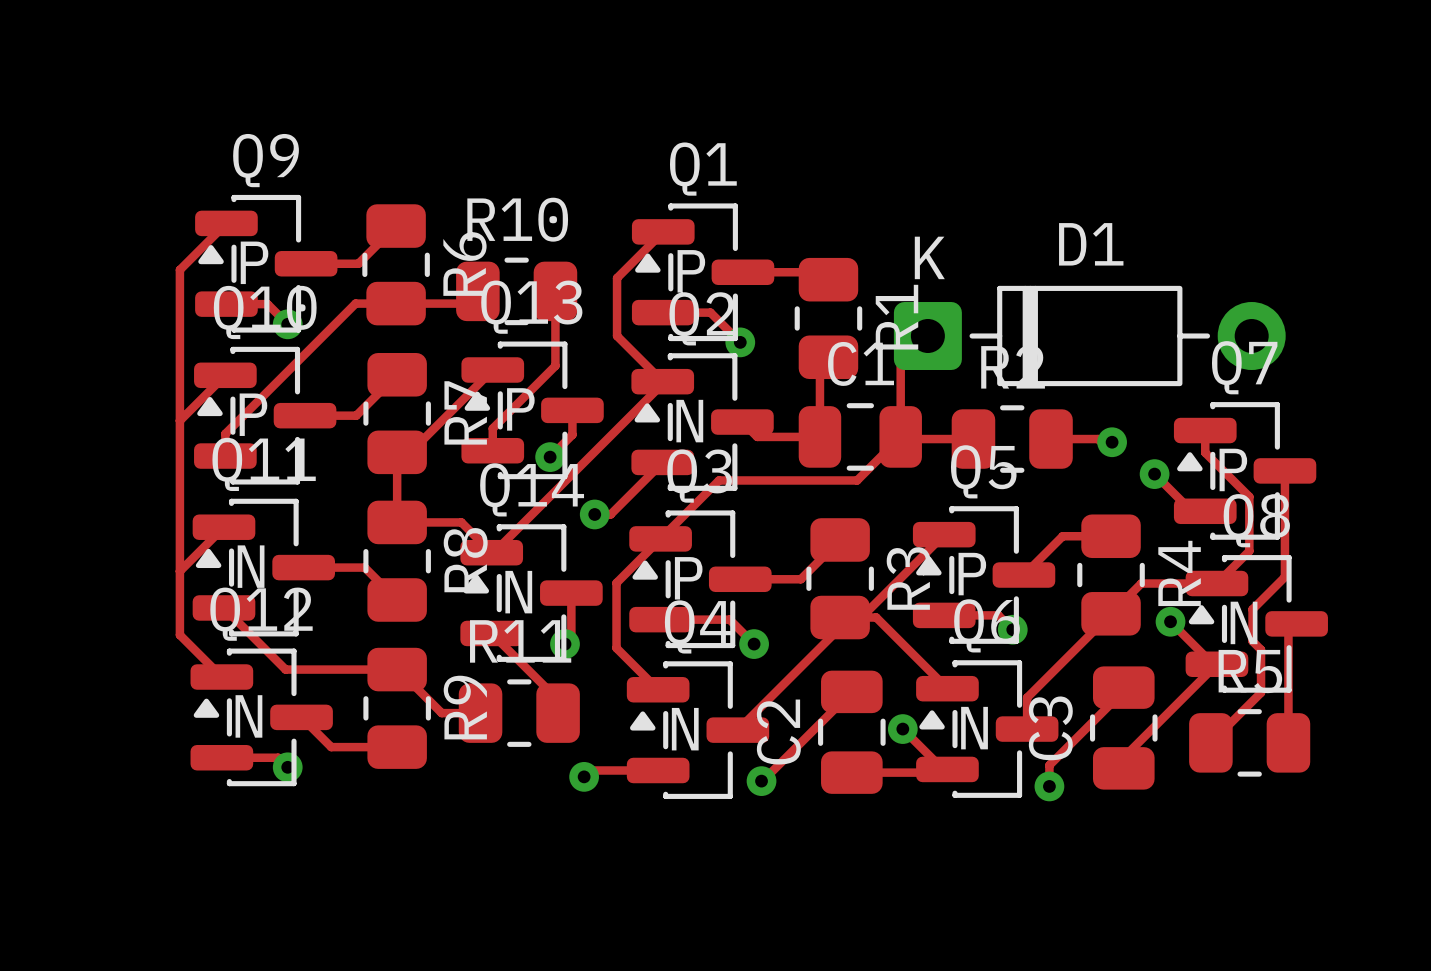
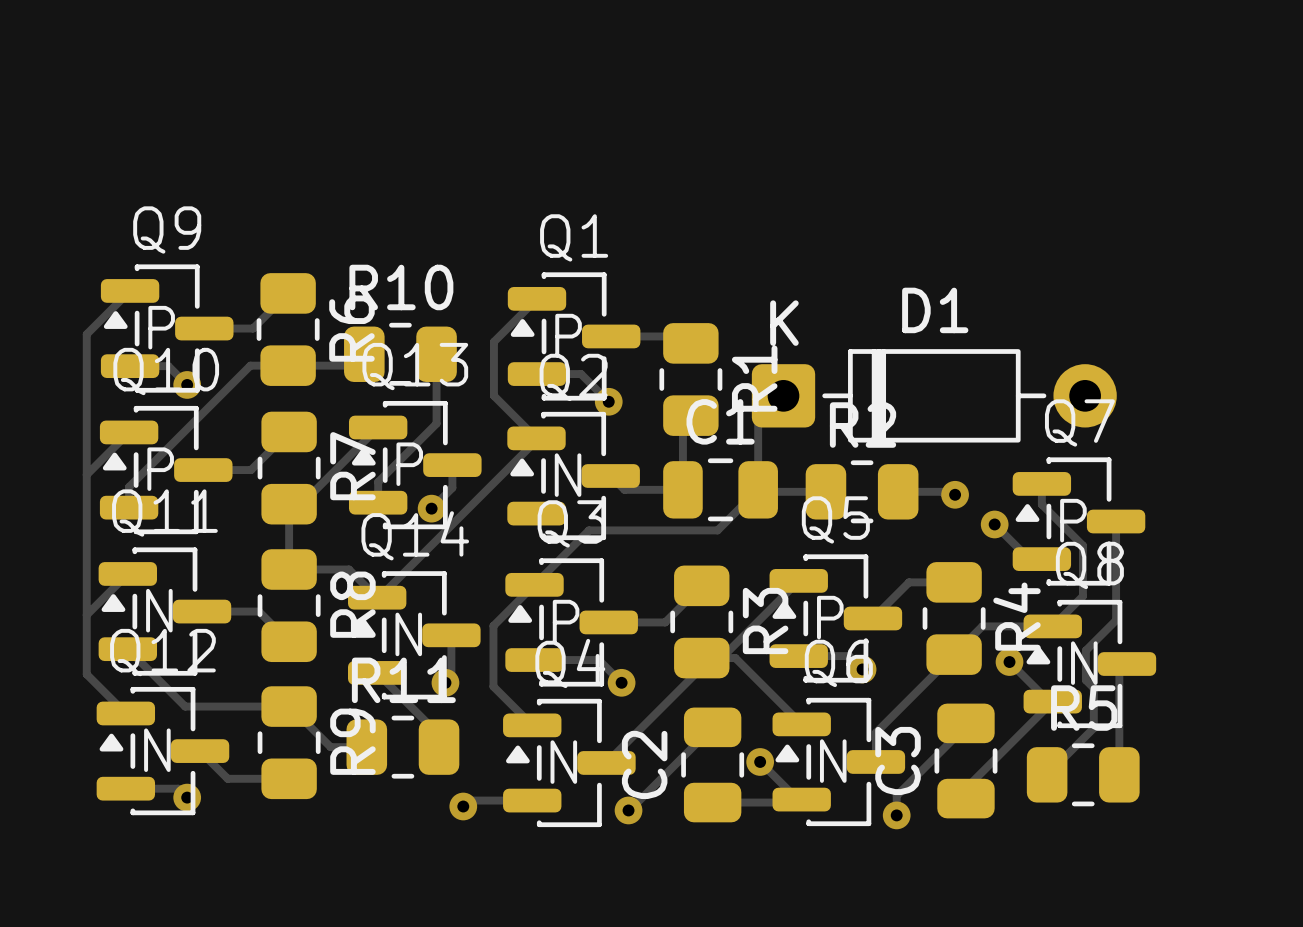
track: (662, 462) (610, 514) (594, 514) -> none
via: (594, 514) -> none

